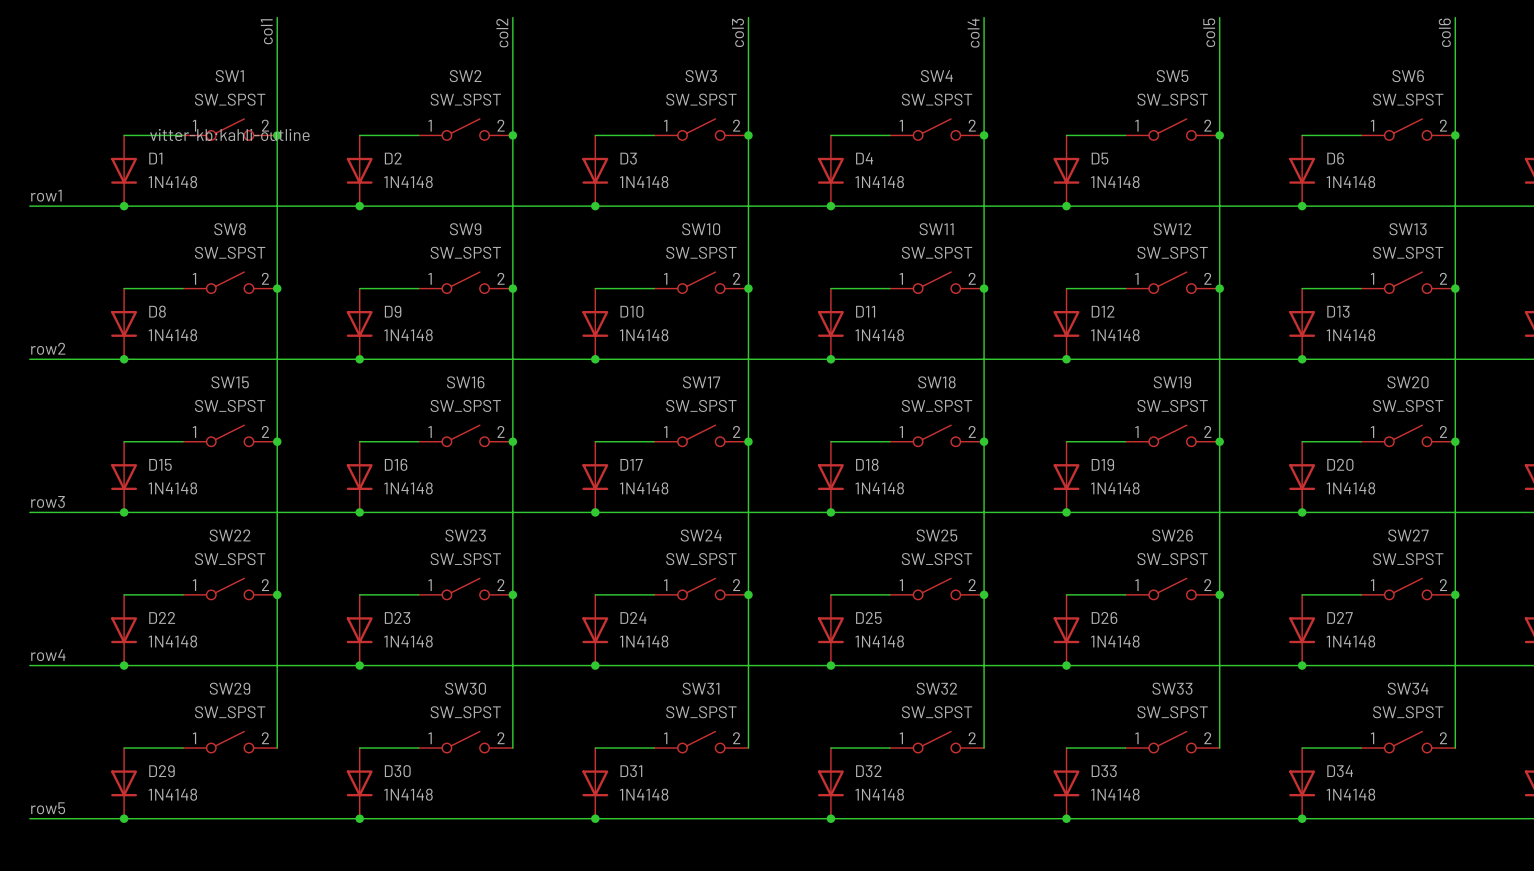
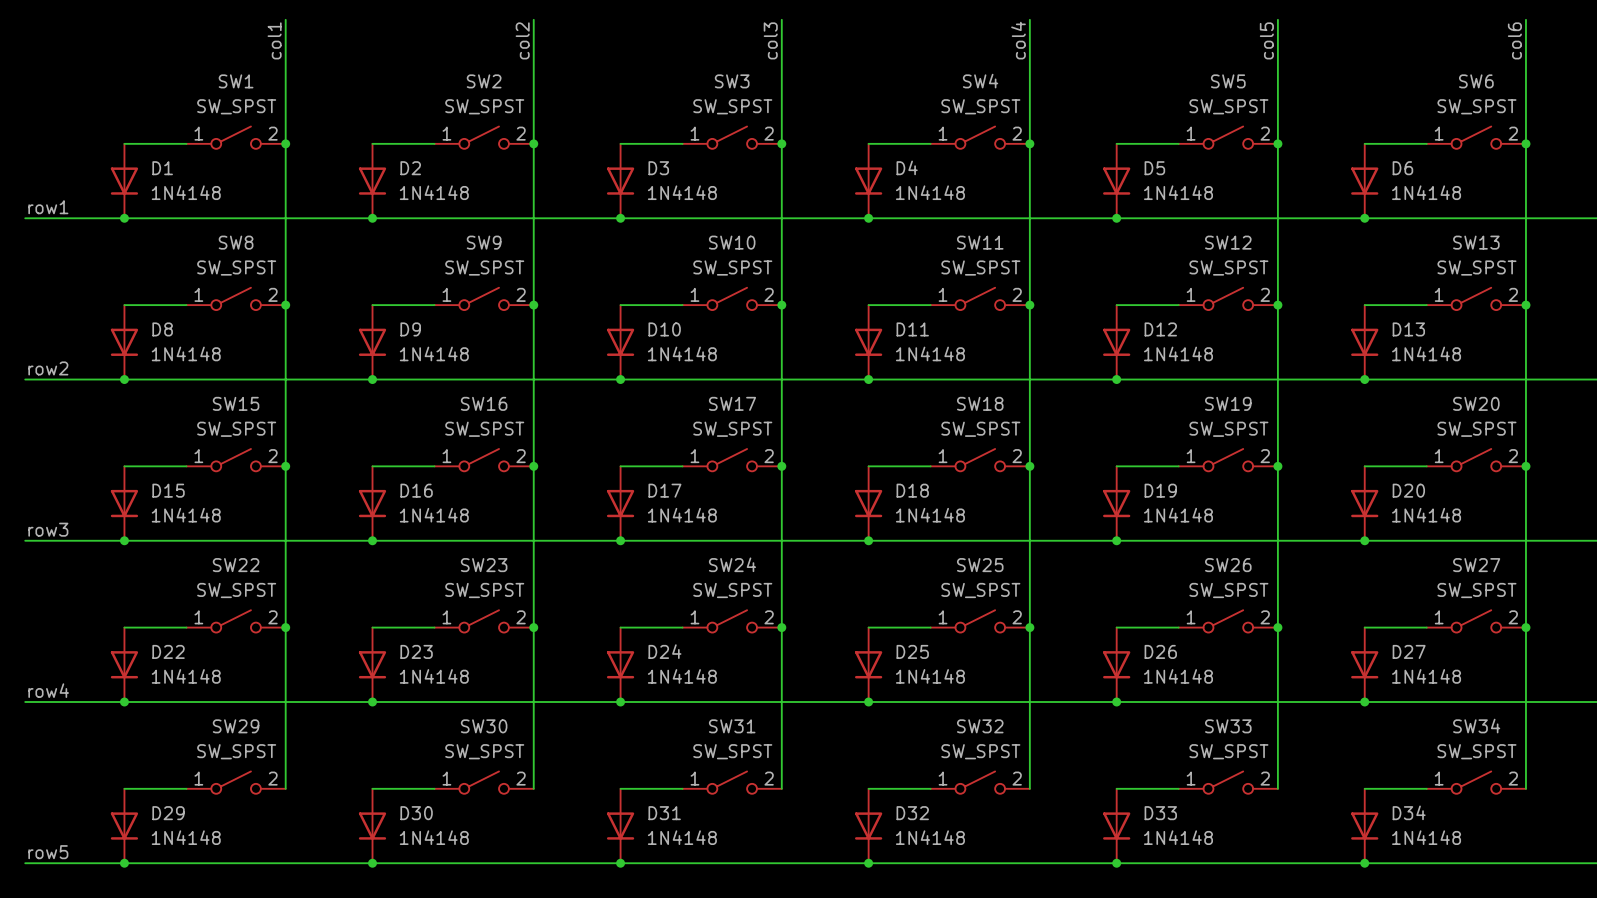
SW1 text: vitter-kb:kahli-outline (229, 134) -> none

